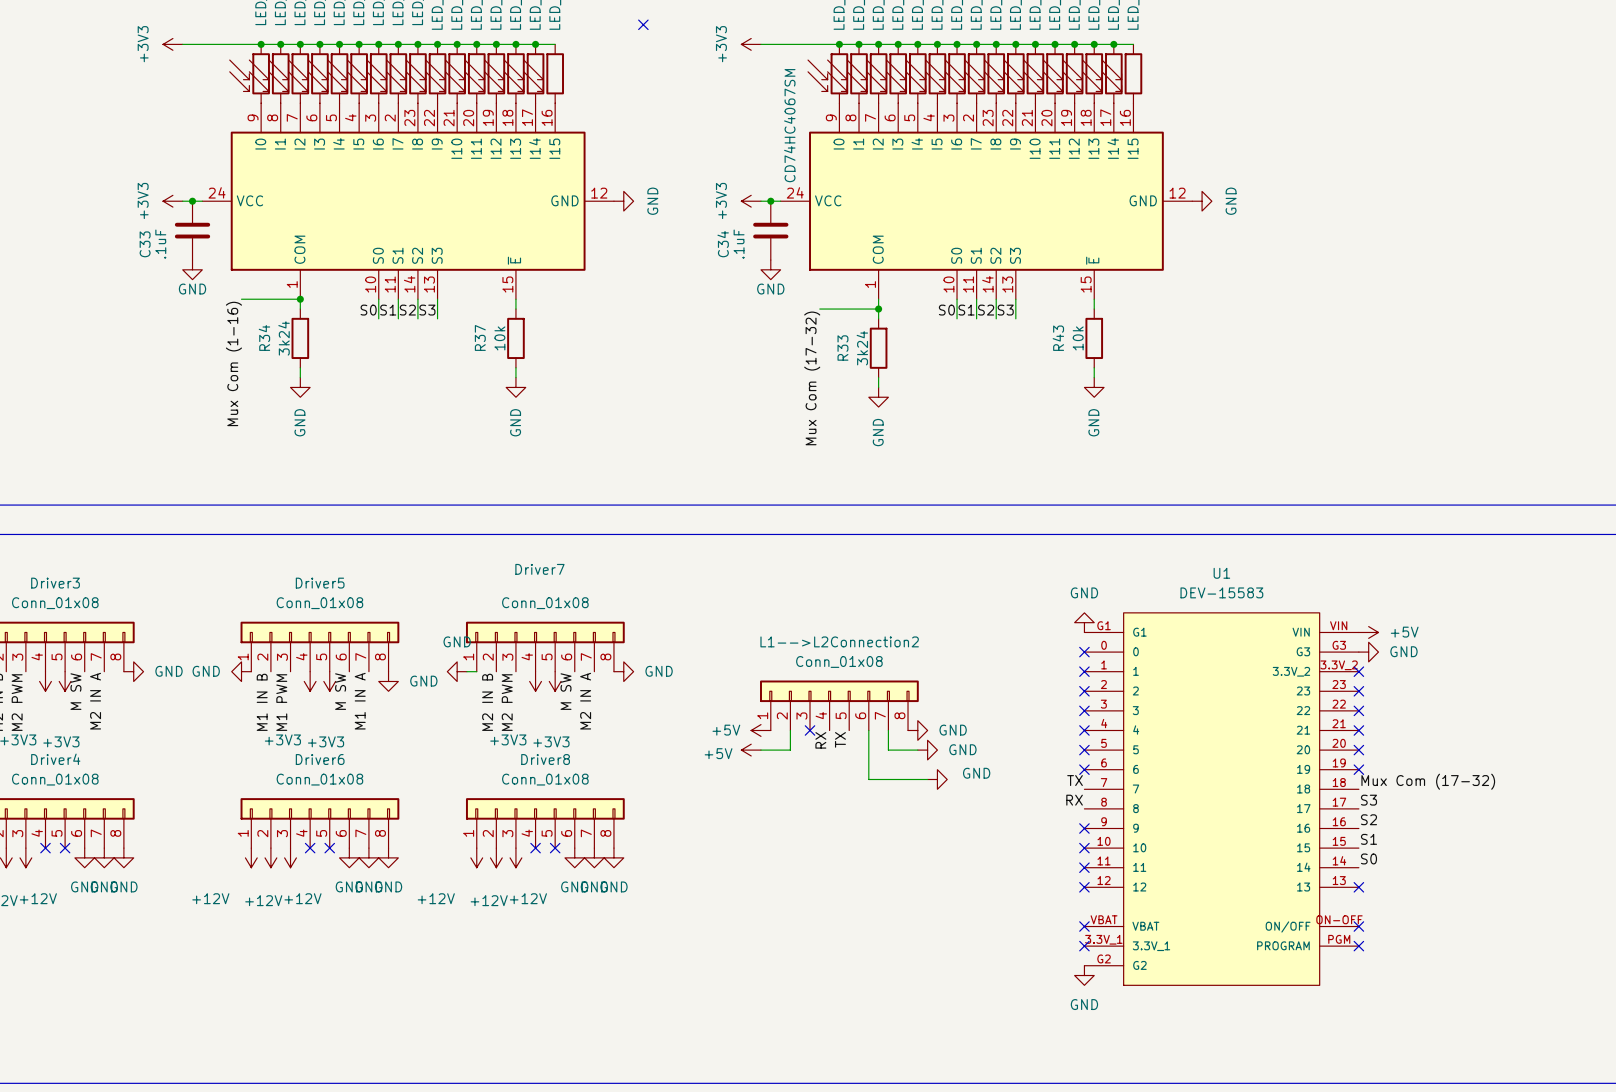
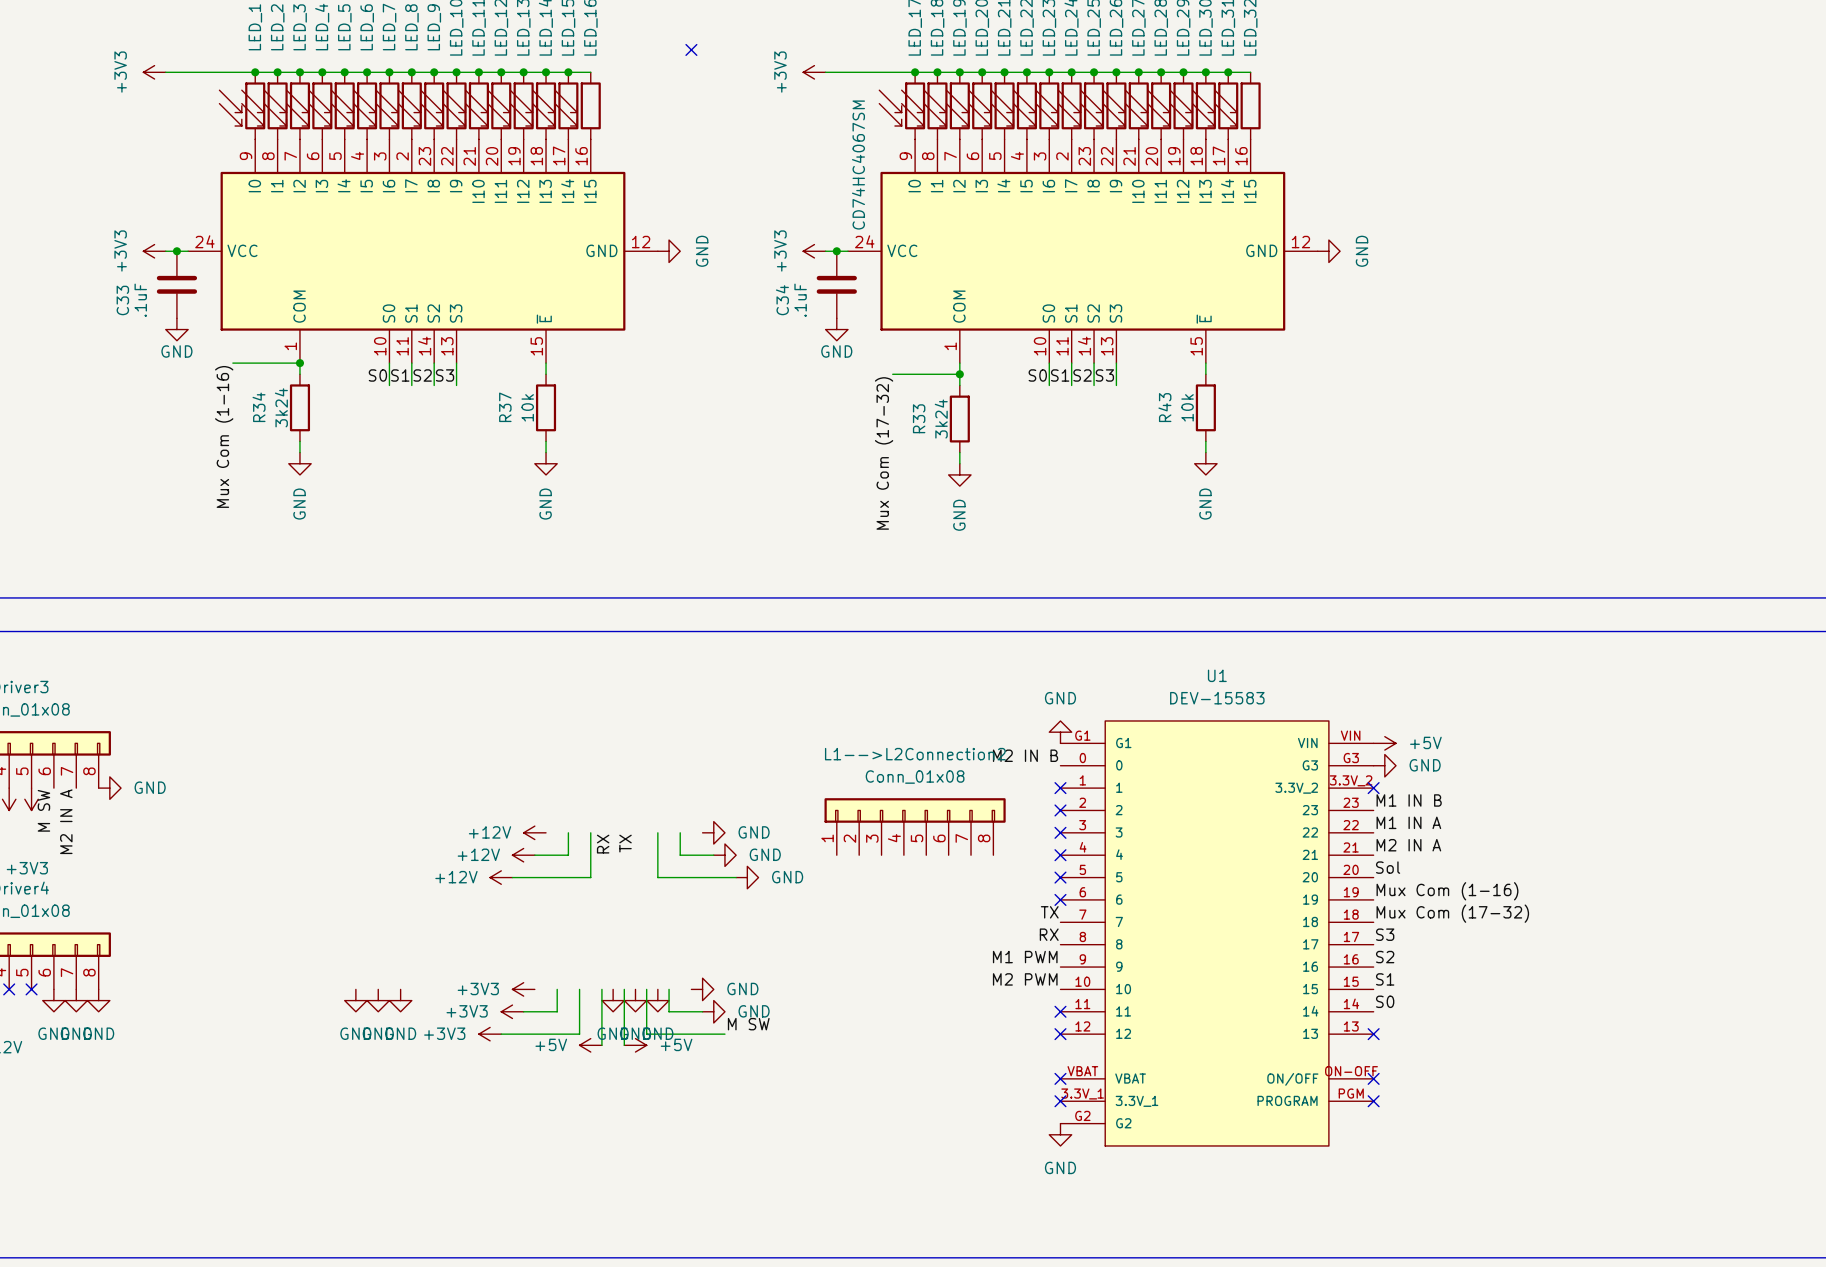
power symbol: none -> GND (1060, 732)
power symbol: GND (1084, 622) -> none
power symbol position: +5V (1368, 632) -> +5V (1384, 743)
label: none -> M2 IN B (1025, 755)
Driver5: Conn_01x08 (319, 646) -> none
Driver7: Conn_01x08 (545, 646) -> none
no-connect mark: (1084, 652) -> none
power symbol: none -> GND (1384, 765)
power symbol: GND (1368, 652) -> none
power symbol: GND (241, 671) -> none
power symbol: GND (457, 671) -> none
wire: (466, 671) (476, 671) -> none
power symbol: GND (623, 671) -> none
no-connect mark: none -> (1060, 788)
no-connect mark: (1084, 671) -> none
no-connect mark: none -> (1373, 788)
no-connect mark: (1358, 671) -> none
power symbol: +3V3 (310, 681) -> none
power symbol: +3V3 (329, 681) -> none
power symbol: GND (388, 681) -> none
power symbol: +3V3 (535, 681) -> none
power symbol: +3V3 (555, 681) -> none
label: none -> M1 IN B (1409, 800)
label: M SW (340, 691) -> none
label: M SW (566, 691) -> none
no-connect mark: none -> (1060, 810)
no-connect mark: (1084, 691) -> none
no-connect mark: (1358, 691) -> none
label: M1 IN A (360, 701) -> none
label: M2 IN A (585, 701) -> none
label: M1 IN B (262, 702) -> none
label: M1 PWM (281, 702) -> none
label: M2 IN B (487, 702) -> none
label: M2 PWM (507, 702) -> none
label: none -> M1 IN A (1408, 822)
power symbol: none -> +12V (534, 832)
wire: none -> (568, 832) (568, 855) (534, 855)
wire: none -> (590, 832) (590, 877) (512, 877)
wire: none -> (657, 832) (657, 877) (736, 877)
wire: none -> (680, 832) (680, 855) (713, 855)
power symbol: none -> GND (713, 832)
no-connect mark: none -> (1060, 832)
no-connect mark: (1084, 710) -> none
no-connect mark: (1358, 710) -> none
label: none -> RX (603, 844)
label: none -> TX (625, 843)
label: none -> M2 IN A (1408, 845)
power symbol: none -> +12V (523, 855)
power symbol: none -> GND (724, 855)
power symbol: +5V (760, 730) -> none
wire: (790, 730) (790, 750) (760, 750) -> none
no-connect mark: (810, 730) -> none
wire: (868, 730) (868, 779) (927, 779) -> none
wire: (888, 730) (888, 750) (917, 750) -> none
power symbol: GND (917, 730) -> none
no-connect mark: none -> (1060, 855)
no-connect mark: (1084, 730) -> none
no-connect mark: (1358, 730) -> none
label: TX (840, 739) -> none
label: RX (820, 740) -> none
label: none -> Sol (1388, 867)
power symbol: none -> +12V (501, 877)
power symbol: none -> GND (747, 877)
power symbol: +5V (751, 750) -> none
power symbol: GND (927, 750) -> none
no-connect mark: none -> (1060, 877)
no-connect mark: (1084, 750) -> none
no-connect mark: (1358, 750) -> none
label: none -> Mux Com (1-16) (1447, 891)
no-connect mark: none -> (1060, 899)
no-connect mark: (1084, 769) -> none
no-connect mark: (1358, 769) -> none
power symbol: GND (937, 779) -> none
label: none -> TX (1049, 912)
label: TX (1075, 780) -> none
label position: Mux Com (17-32) (1428, 781) -> Mux Com (17-32) (1452, 913)
U1 position: (1221, 799) -> (1217, 933)
label: none -> RX (1049, 934)
label: RX (1074, 800) -> none
label position: S3 (1368, 800) -> S3 (1385, 934)
label: none -> M1 PWM (1025, 957)
label position: S2 (1368, 819) -> S2 (1385, 957)
Driver6: Conn_01x08 (319, 823) -> none
Driver8: Conn_01x08 (545, 823) -> none
no-connect mark: (1084, 828) -> none
label: none -> M2 PWM (1025, 979)
label position: S1 (1368, 839) -> S1 (1385, 979)
no-connect mark: (310, 848) -> none
no-connect mark: (329, 848) -> none
power symbol: none -> +3V3 (523, 989)
wire: none -> (557, 989) (557, 1011) (523, 1011)
no-connect mark: (535, 848) -> none
wire: none -> (579, 989) (579, 1034) (501, 1034)
no-connect mark: (555, 848) -> none
wire: none -> (601, 989) (601, 1045)
wire: none -> (624, 989) (624, 1045)
wire: none -> (646, 989) (646, 1034) (724, 1034)
wire: none -> (669, 989) (669, 1011) (702, 1011)
power symbol: none -> GND (702, 989)
no-connect mark: (1084, 848) -> none
power symbol: +12V (251, 857) -> none
power symbol: +12V (270, 857) -> none
power symbol: +12V (290, 857) -> none
power symbol: +12V (476, 857) -> none
power symbol: +12V (496, 857) -> none
power symbol: +12V (515, 857) -> none
label position: S0 (1368, 858) -> S0 (1385, 1001)
power symbol: none -> +3V3 (512, 1011)
power symbol: none -> GND (713, 1011)
no-connect mark: none -> (1060, 1011)
no-connect mark: (1084, 867) -> none
label: none -> M SW (748, 1024)
power symbol: none -> +3V3 (490, 1034)
no-connect mark: none -> (1060, 1034)
no-connect mark: (1084, 887) -> none
no-connect mark: none -> (1373, 1034)
no-connect mark: (1358, 887) -> none
power symbol: none -> +5V (590, 1045)
power symbol: none -> +5V (635, 1045)
no-connect mark: none -> (1060, 1078)
no-connect mark: (1084, 926) -> none
no-connect mark: none -> (1373, 1078)
no-connect mark: (1358, 926) -> none
no-connect mark: none -> (1060, 1101)
no-connect mark: (1084, 946) -> none
no-connect mark: none -> (1373, 1101)
no-connect mark: (1358, 946) -> none
power symbol: none -> GND (1060, 1134)
power symbol: GND (1084, 975) -> none

